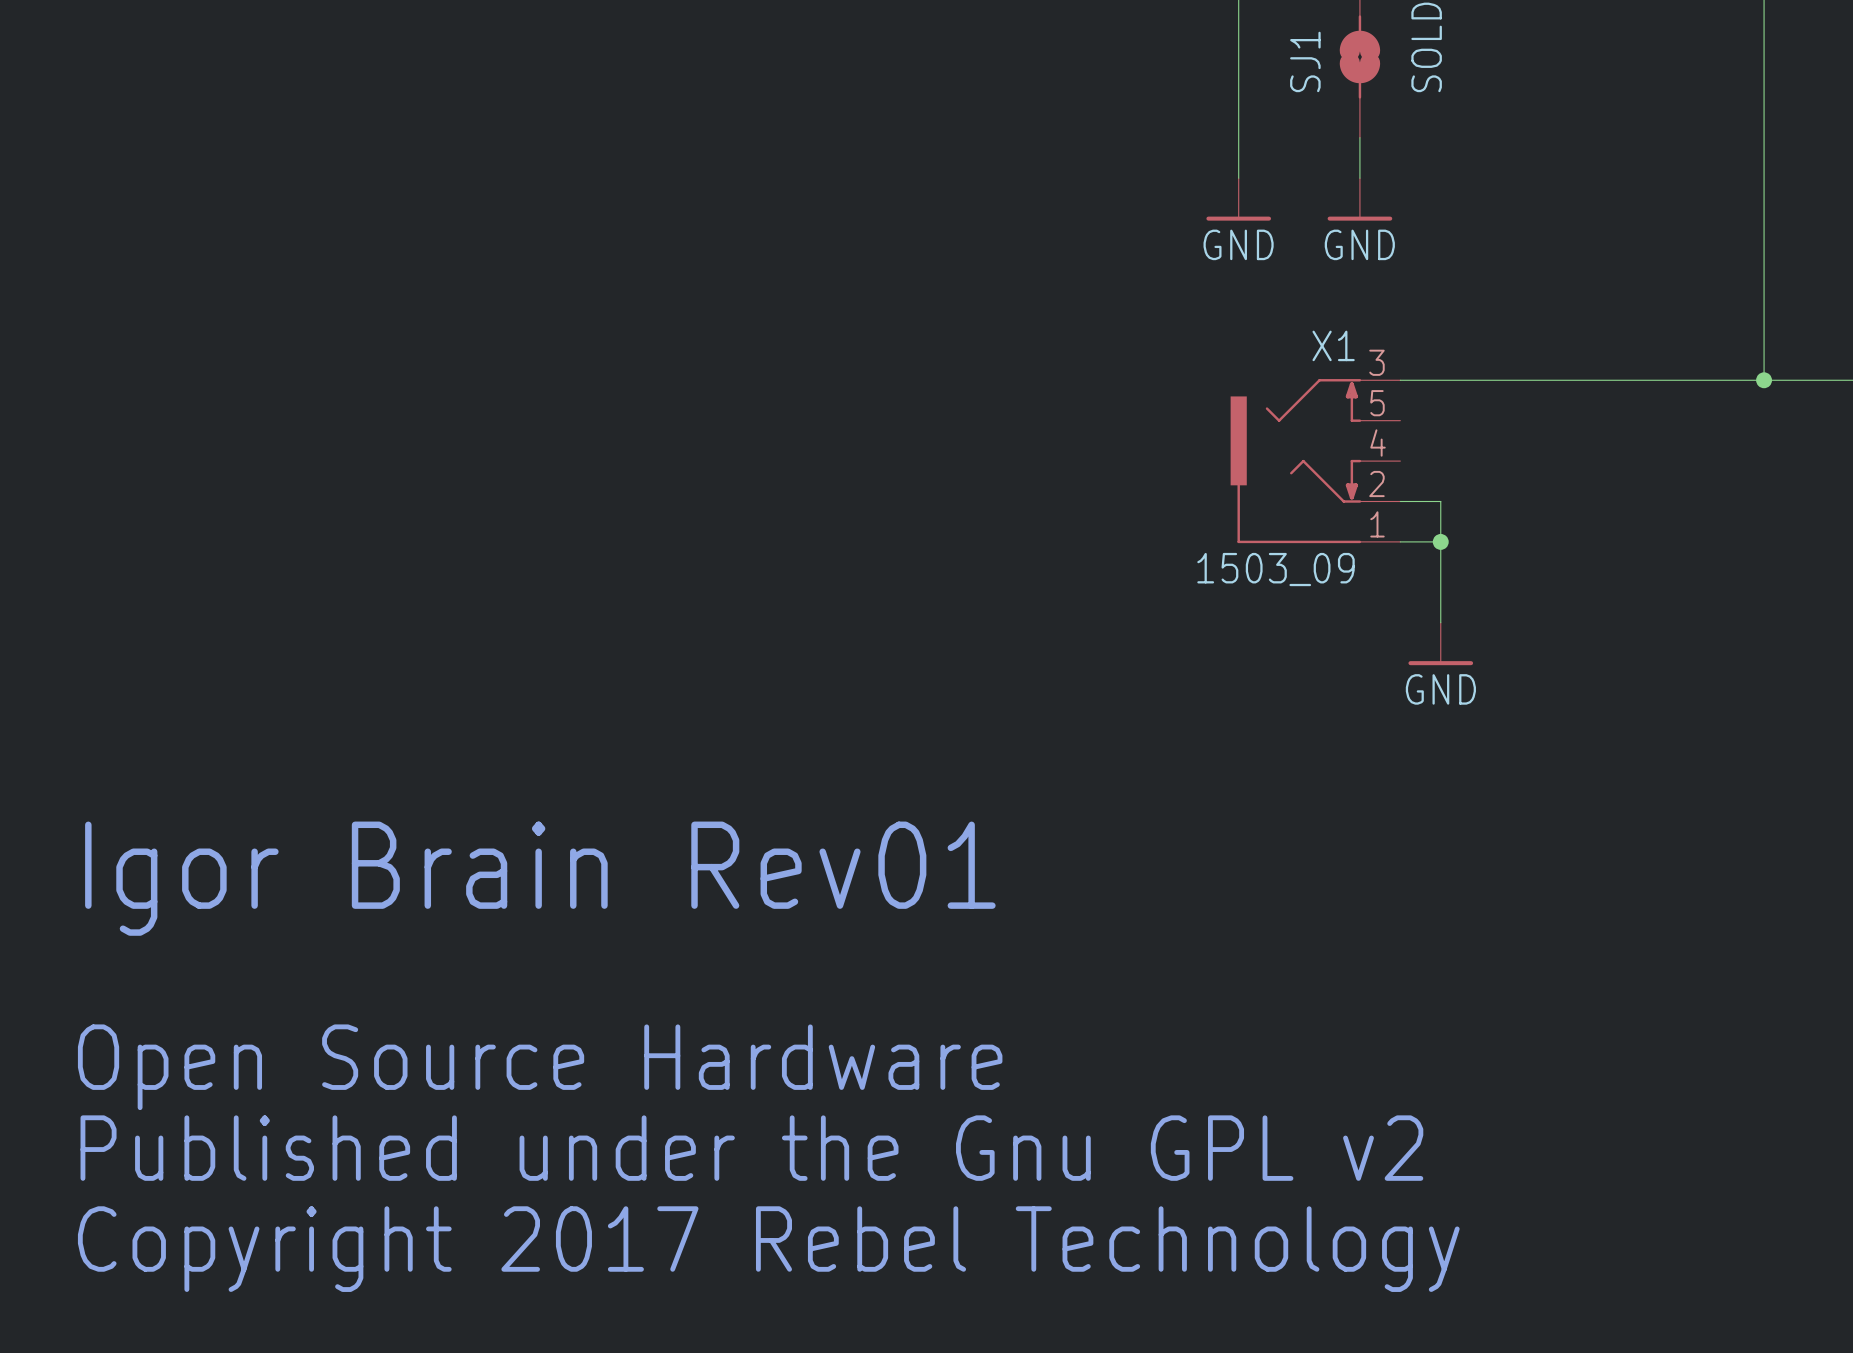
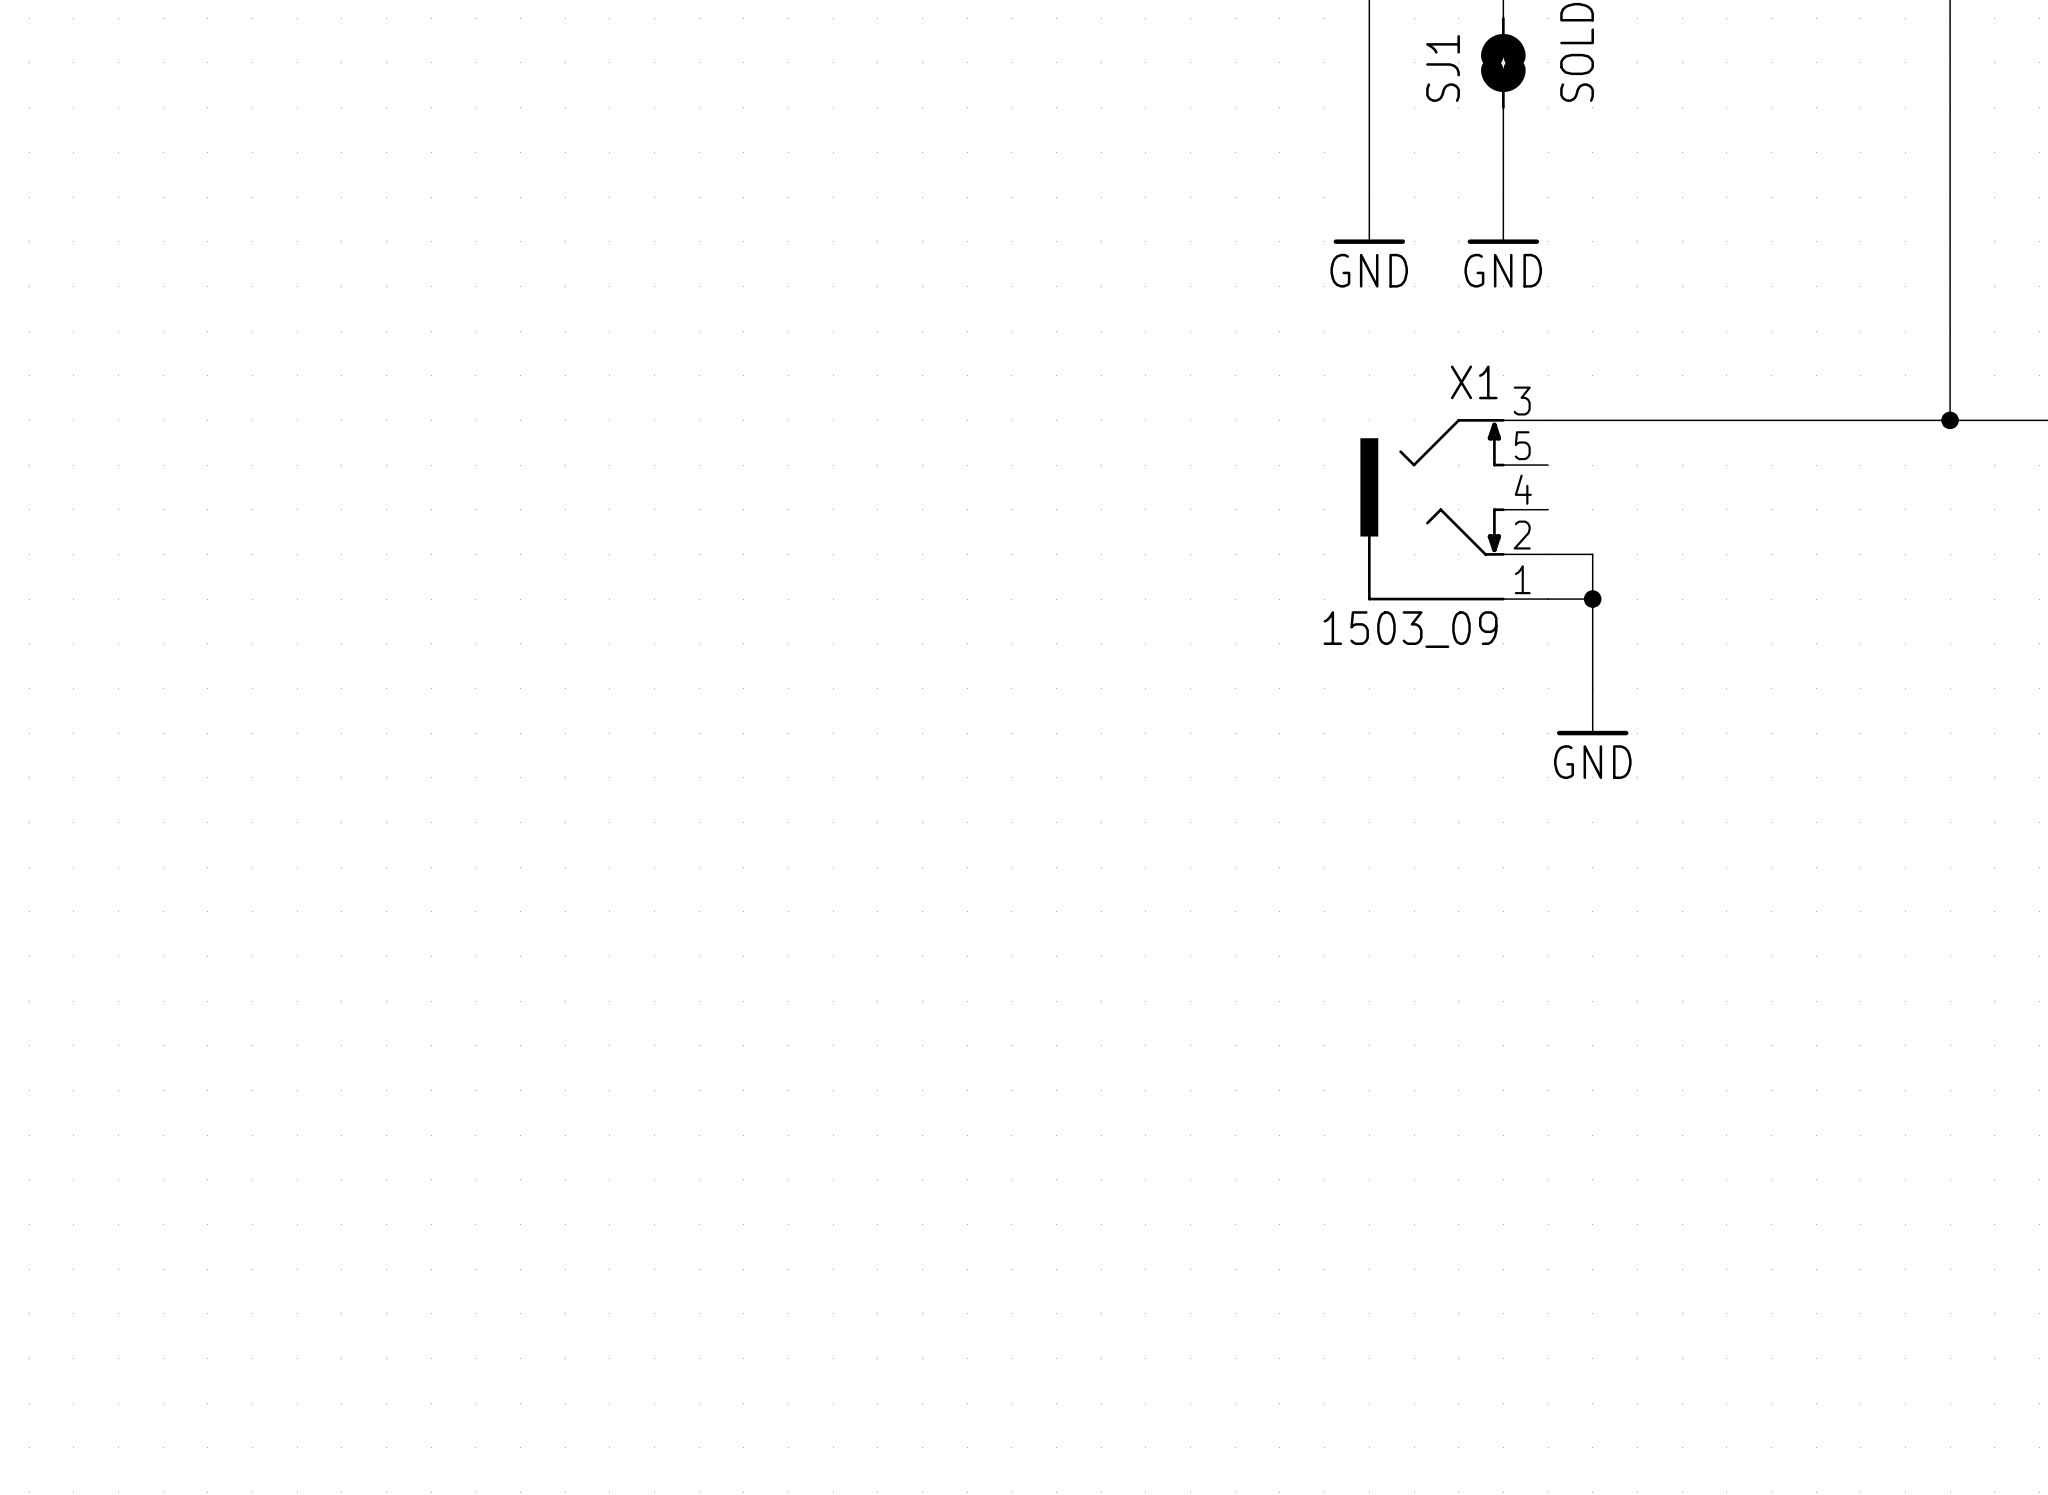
text: Igor Brain Rev01 (540, 878) -> none
text: Open Source Hardware (540, 1067) -> none
text: Published under the Gnu GPL v2 (751, 1148) -> none
text: Copyright 2017 Rebel Technology (768, 1249) -> none

